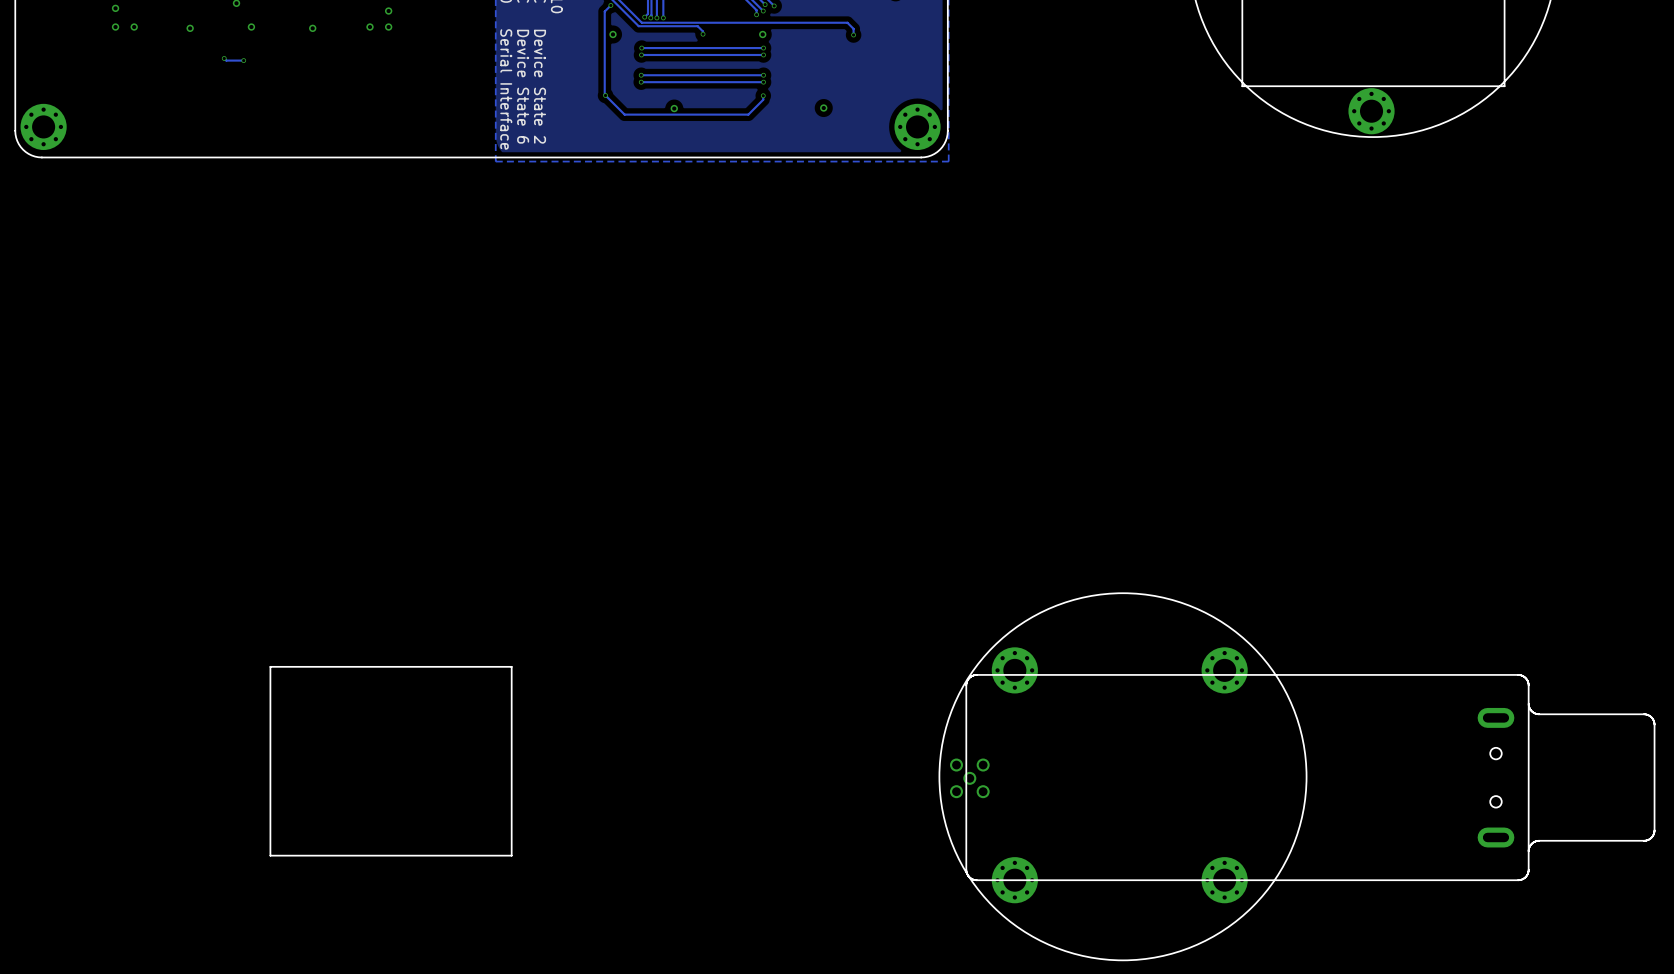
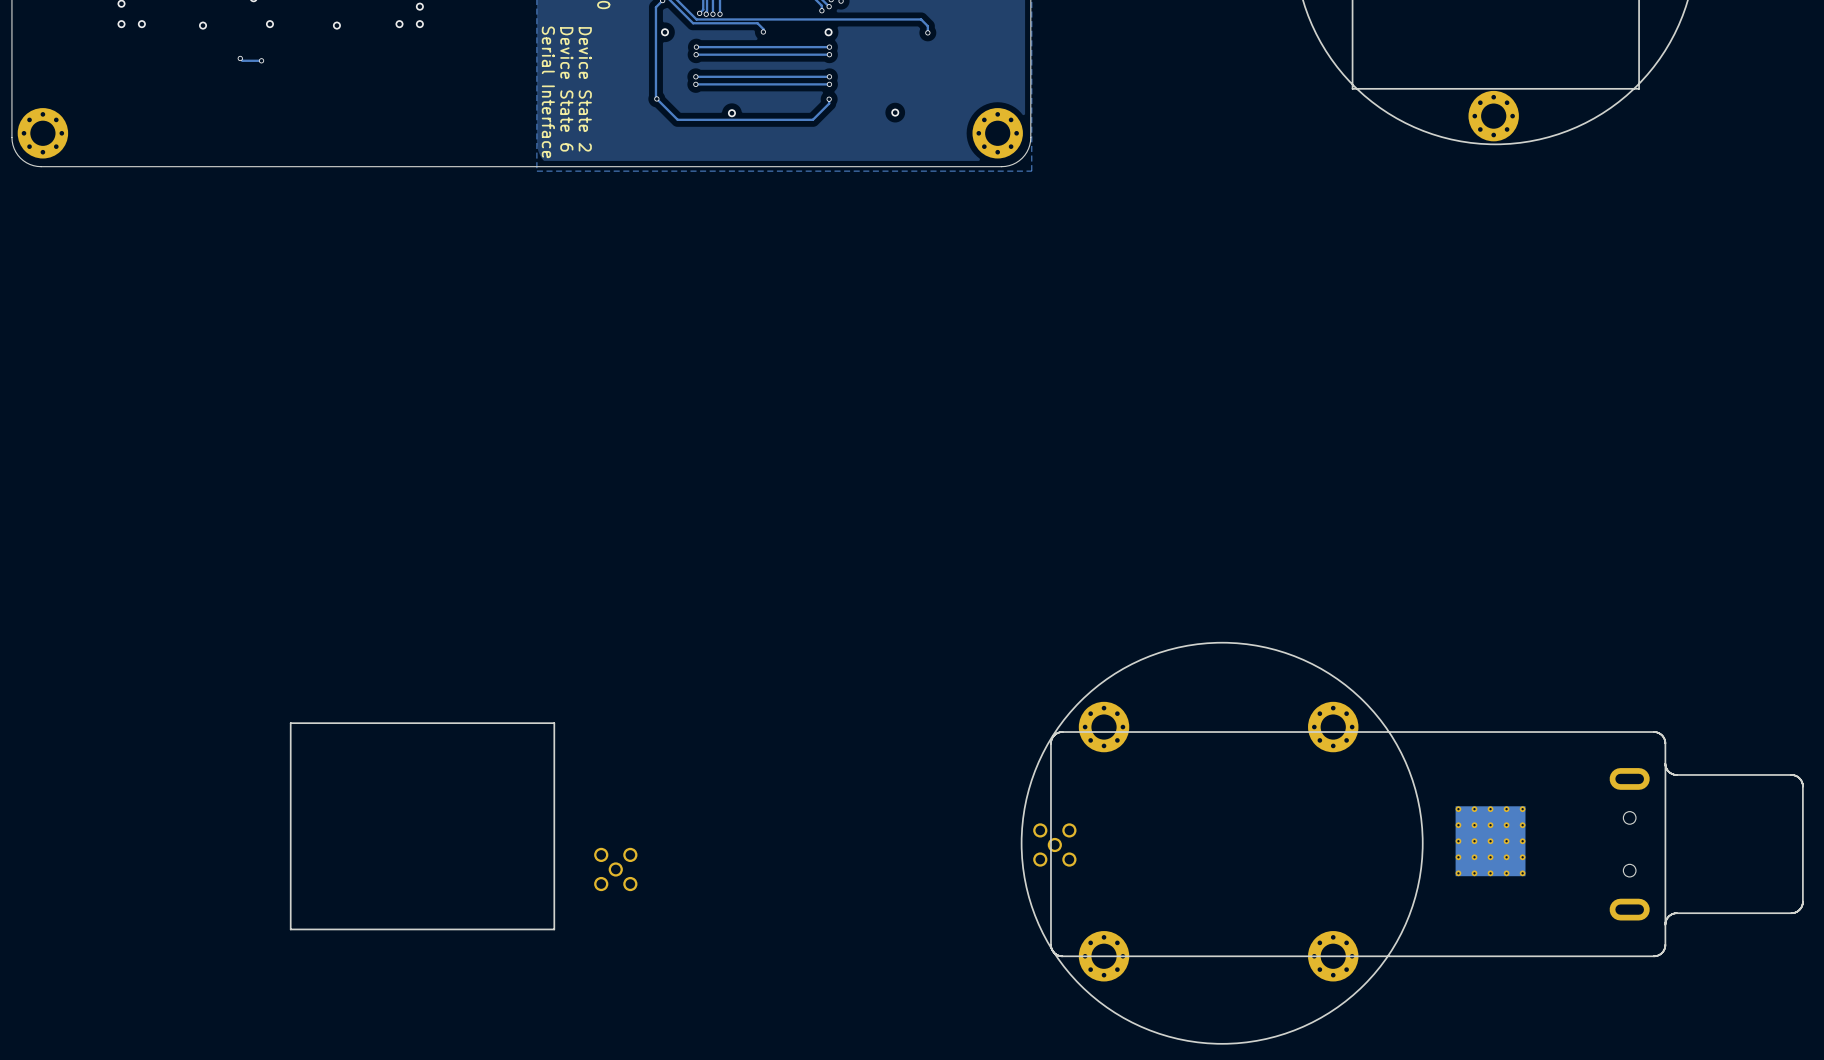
part: none -> (1490, 841)
part: none -> (615, 869)

